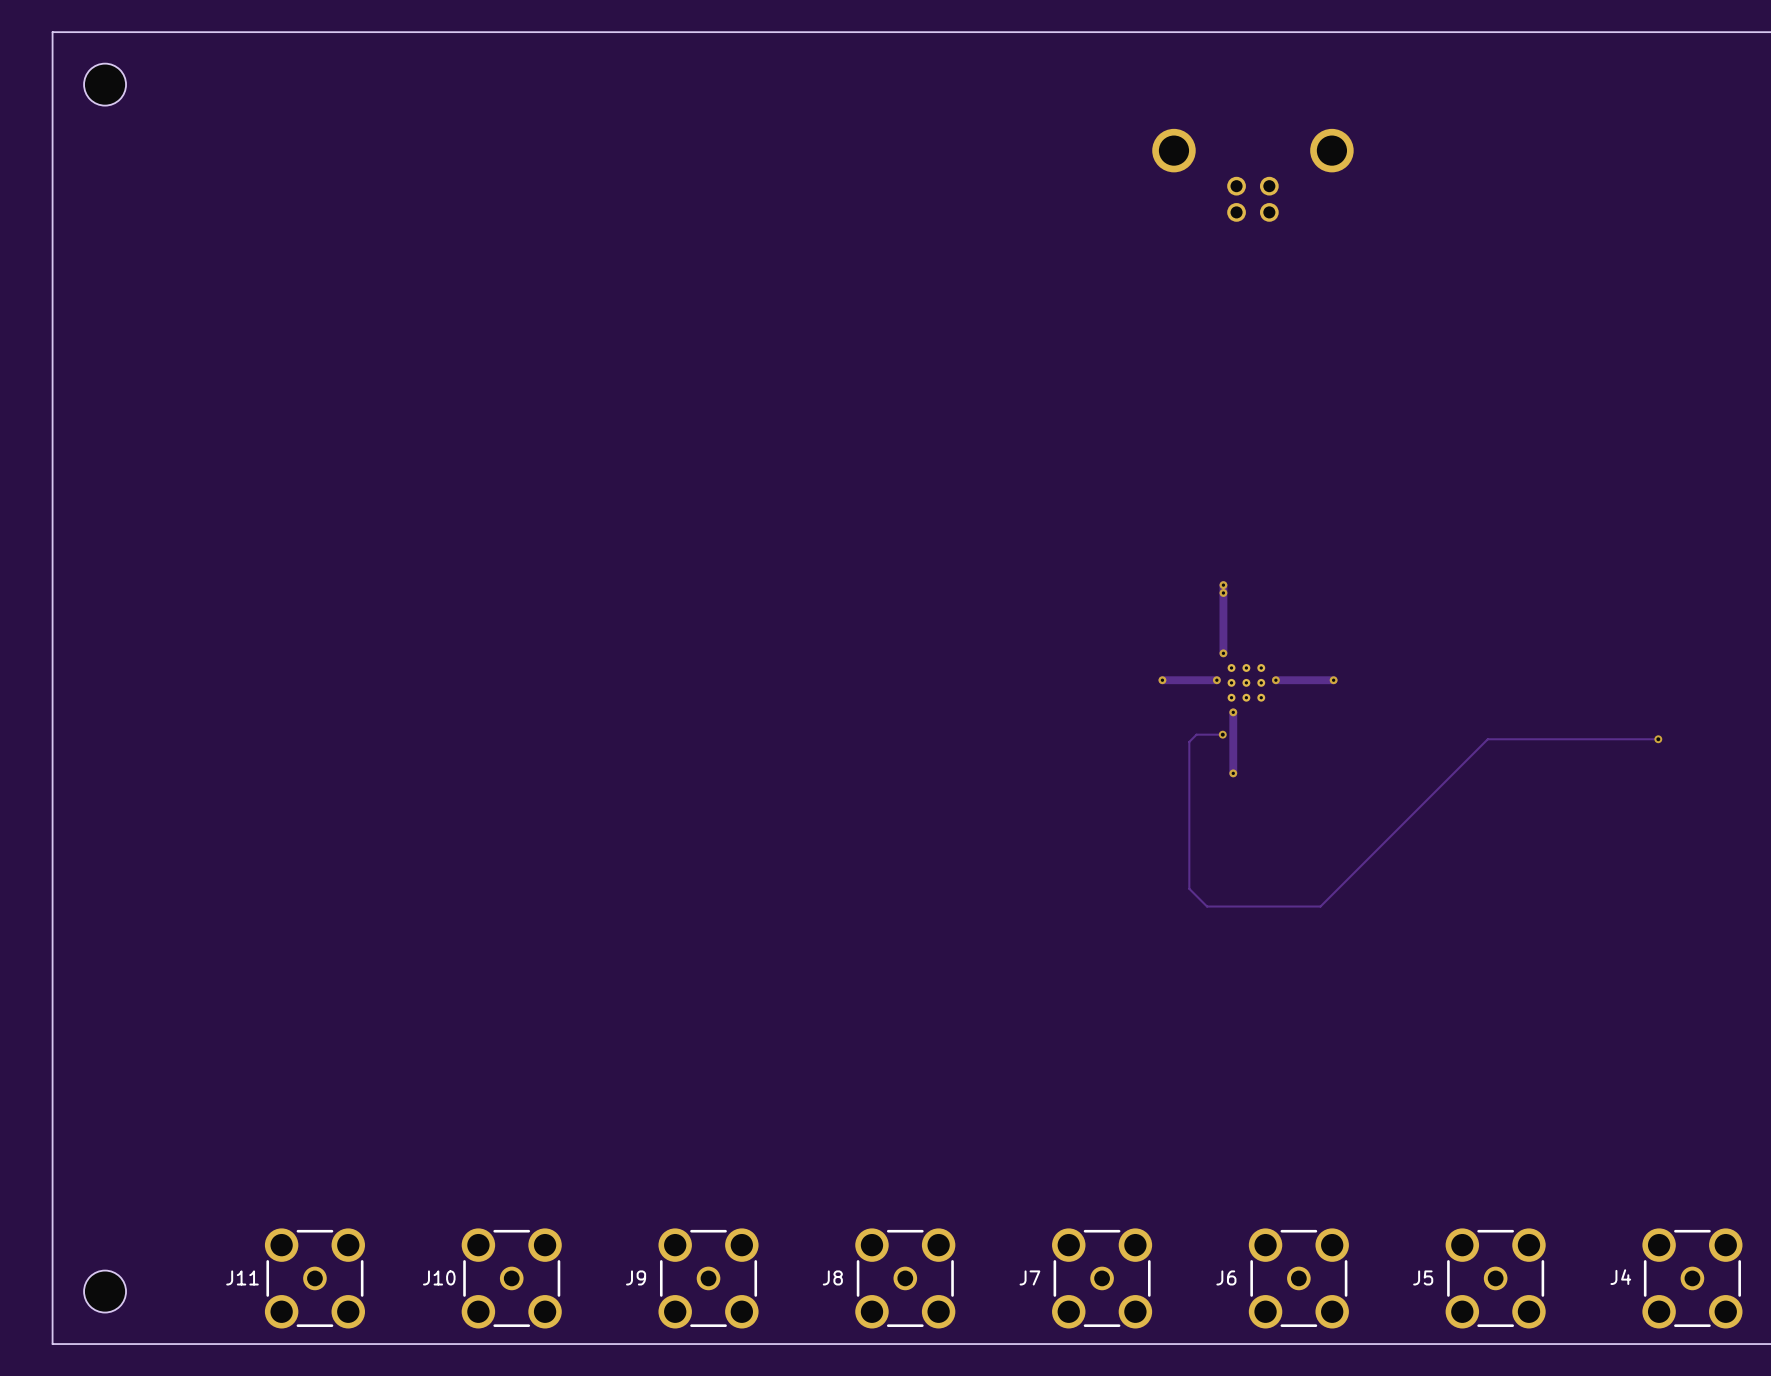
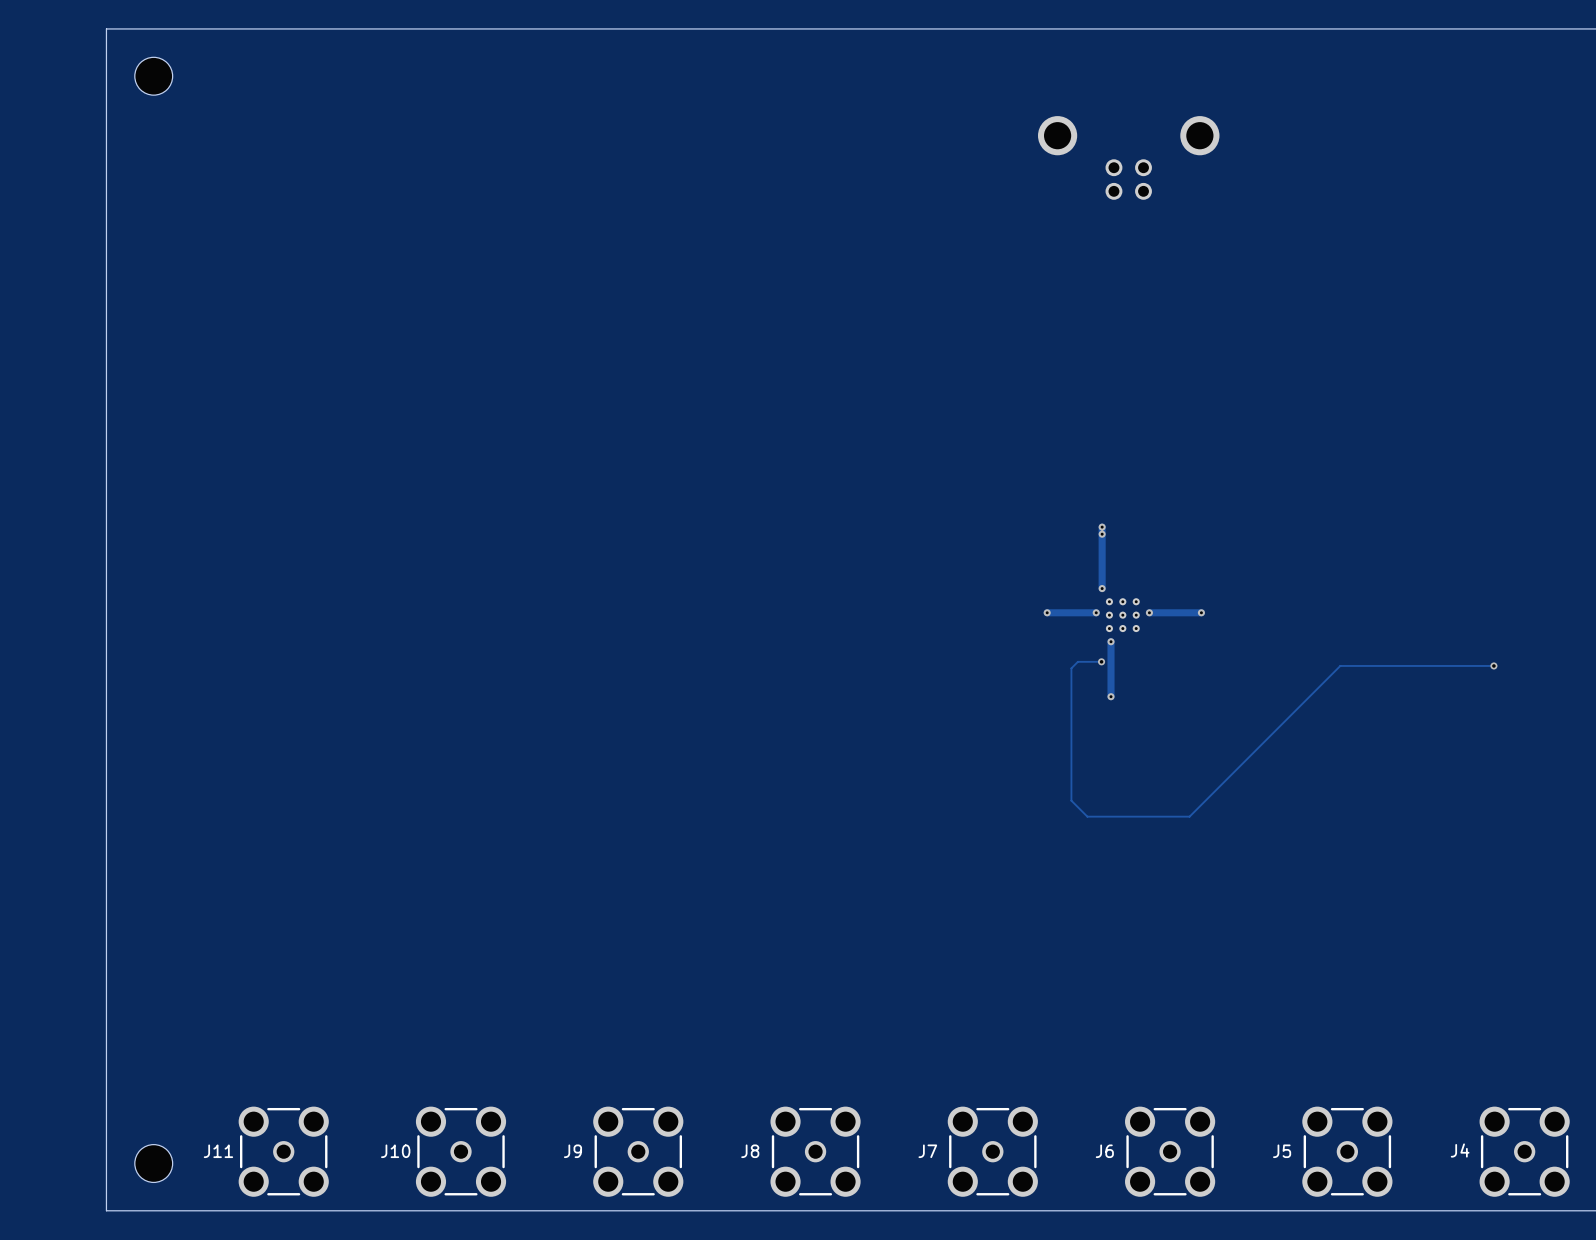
board edge: (118, 32) (52, 32) (52, 1344) (118, 1344) -> (106, 28) (106, 1210)
part position: (105, 84) -> (153, 76)
part position: (105, 1291) -> (153, 1163)

